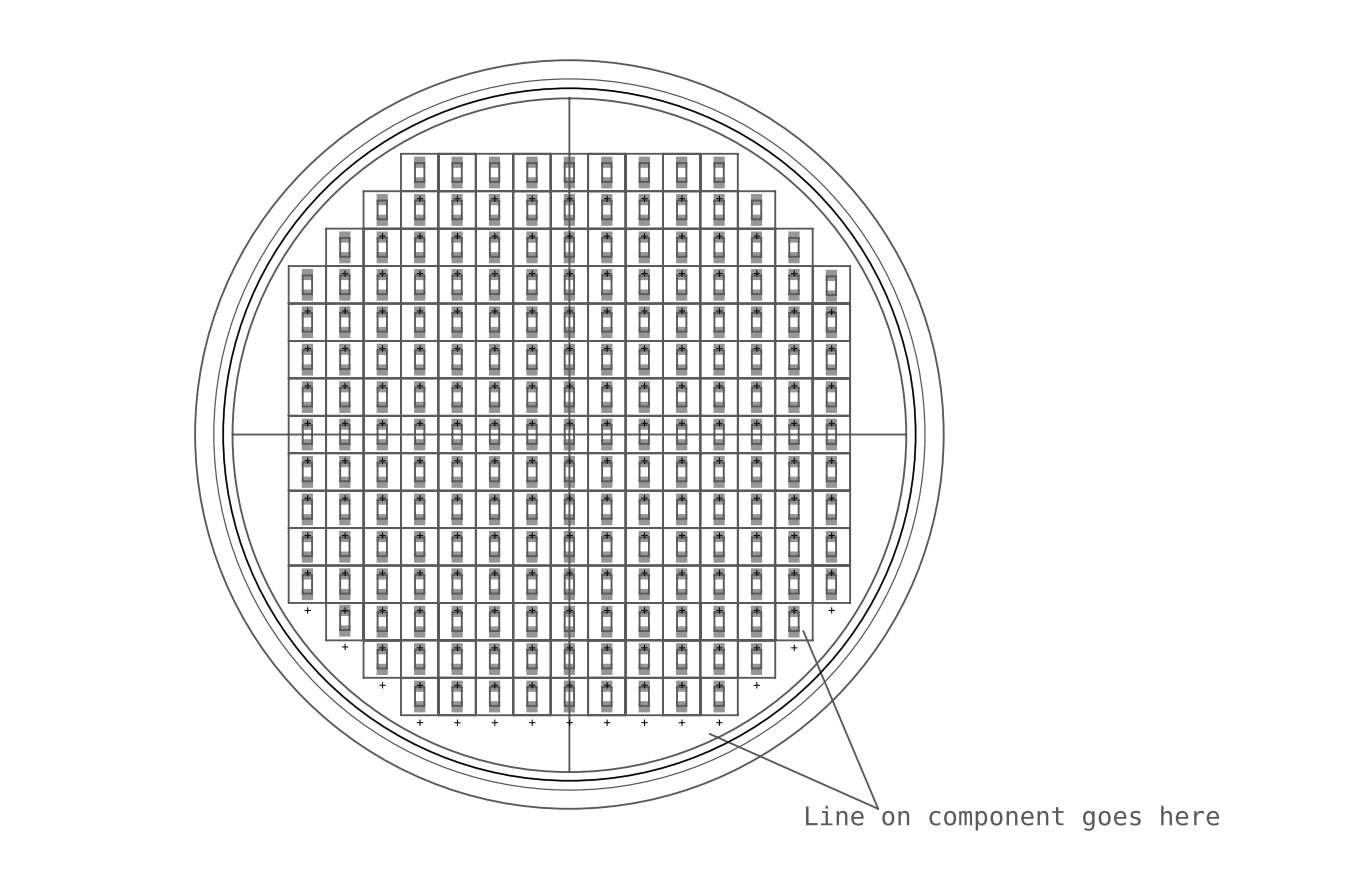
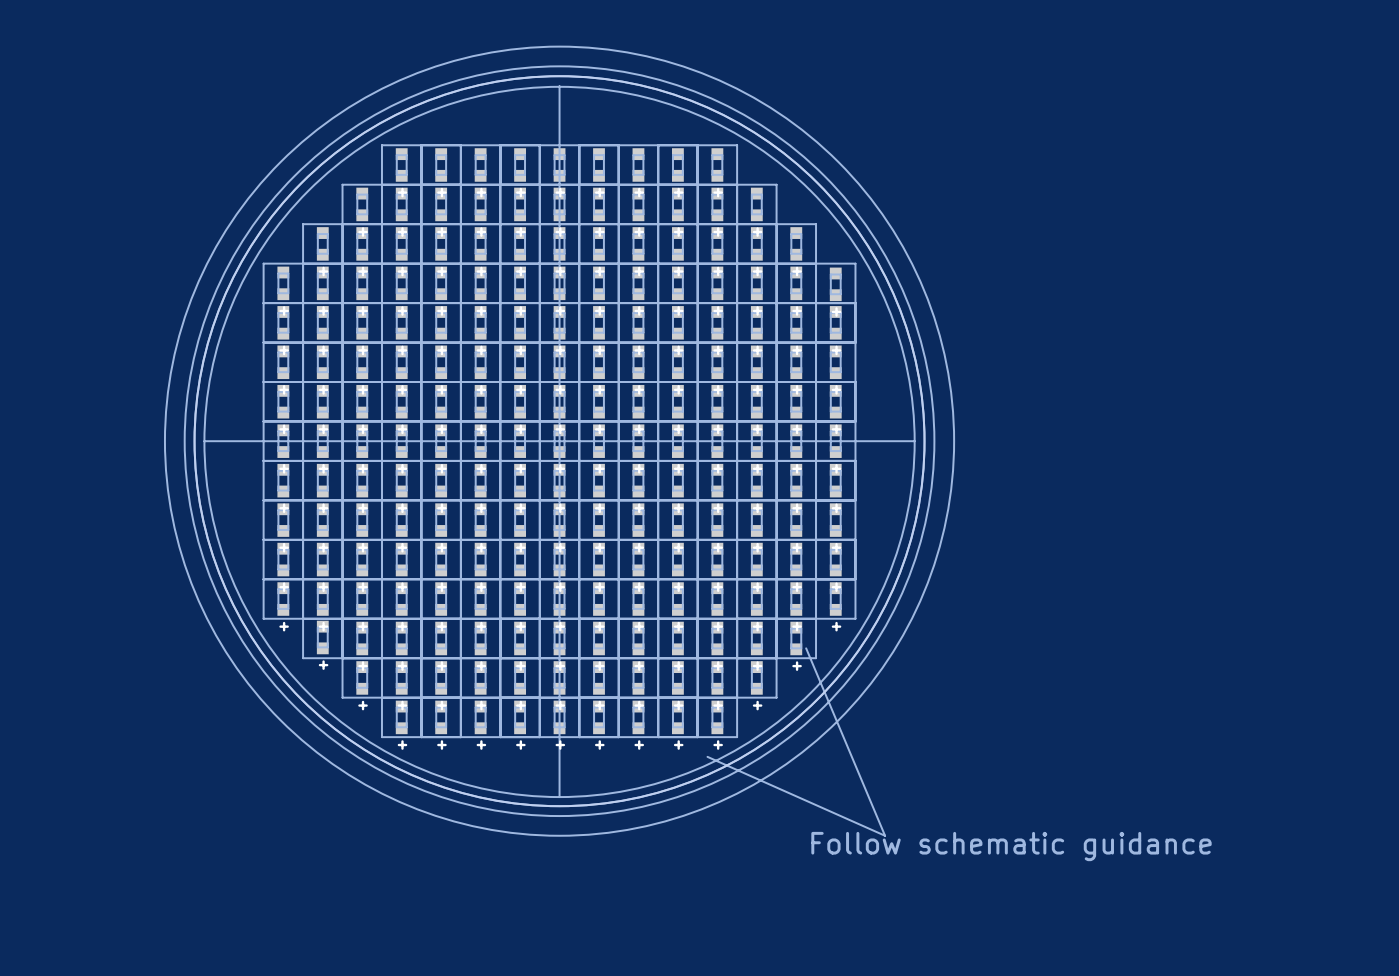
text: Line on component goes here (1012, 818) -> Follow schematic guidance (1011, 846)

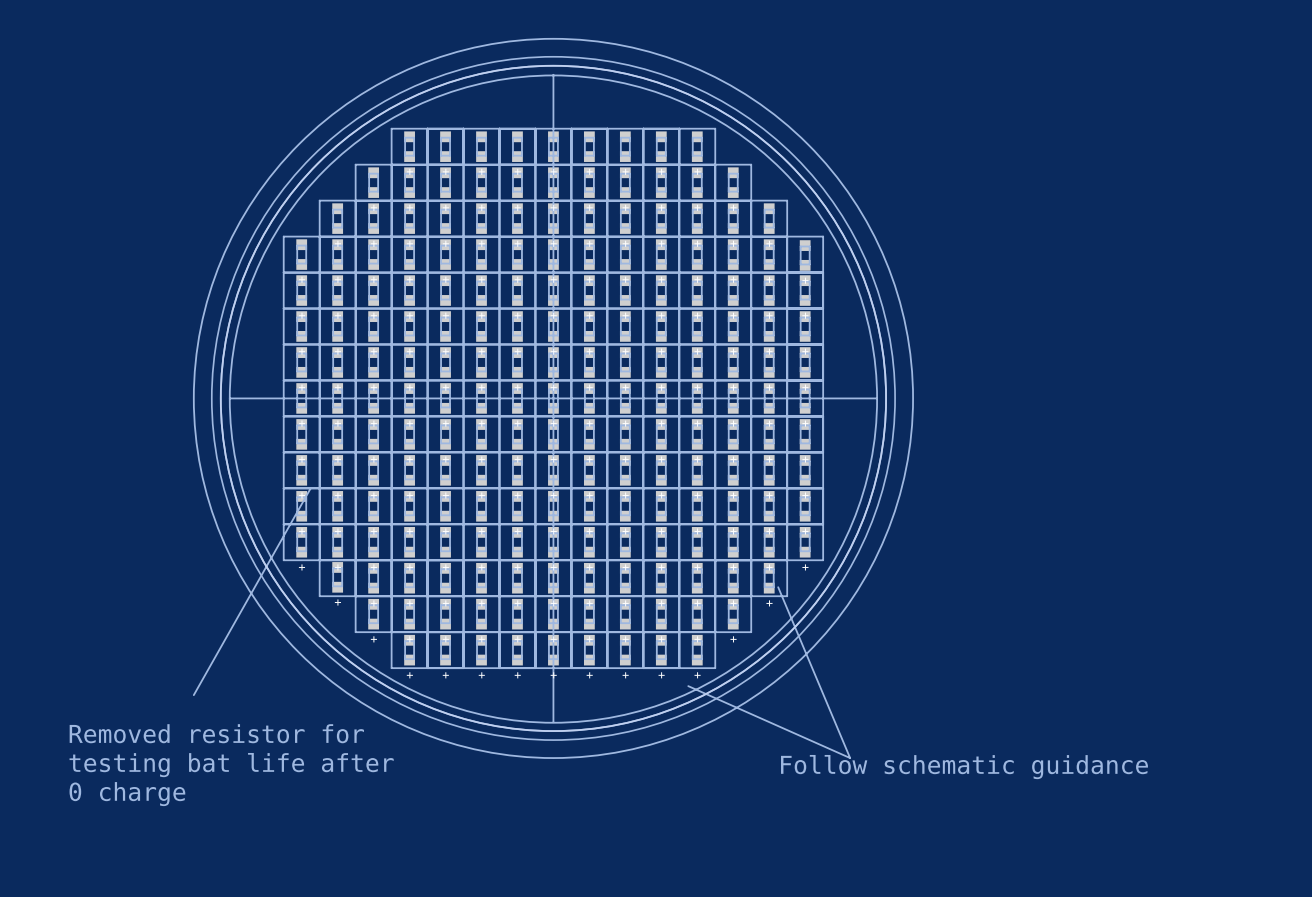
line: none -> (310, 488) (193, 695)
text: none -> Removed resistor for (216, 733)
text: none -> testing bat life after (231, 765)
text: none -> 0 charge (127, 794)

